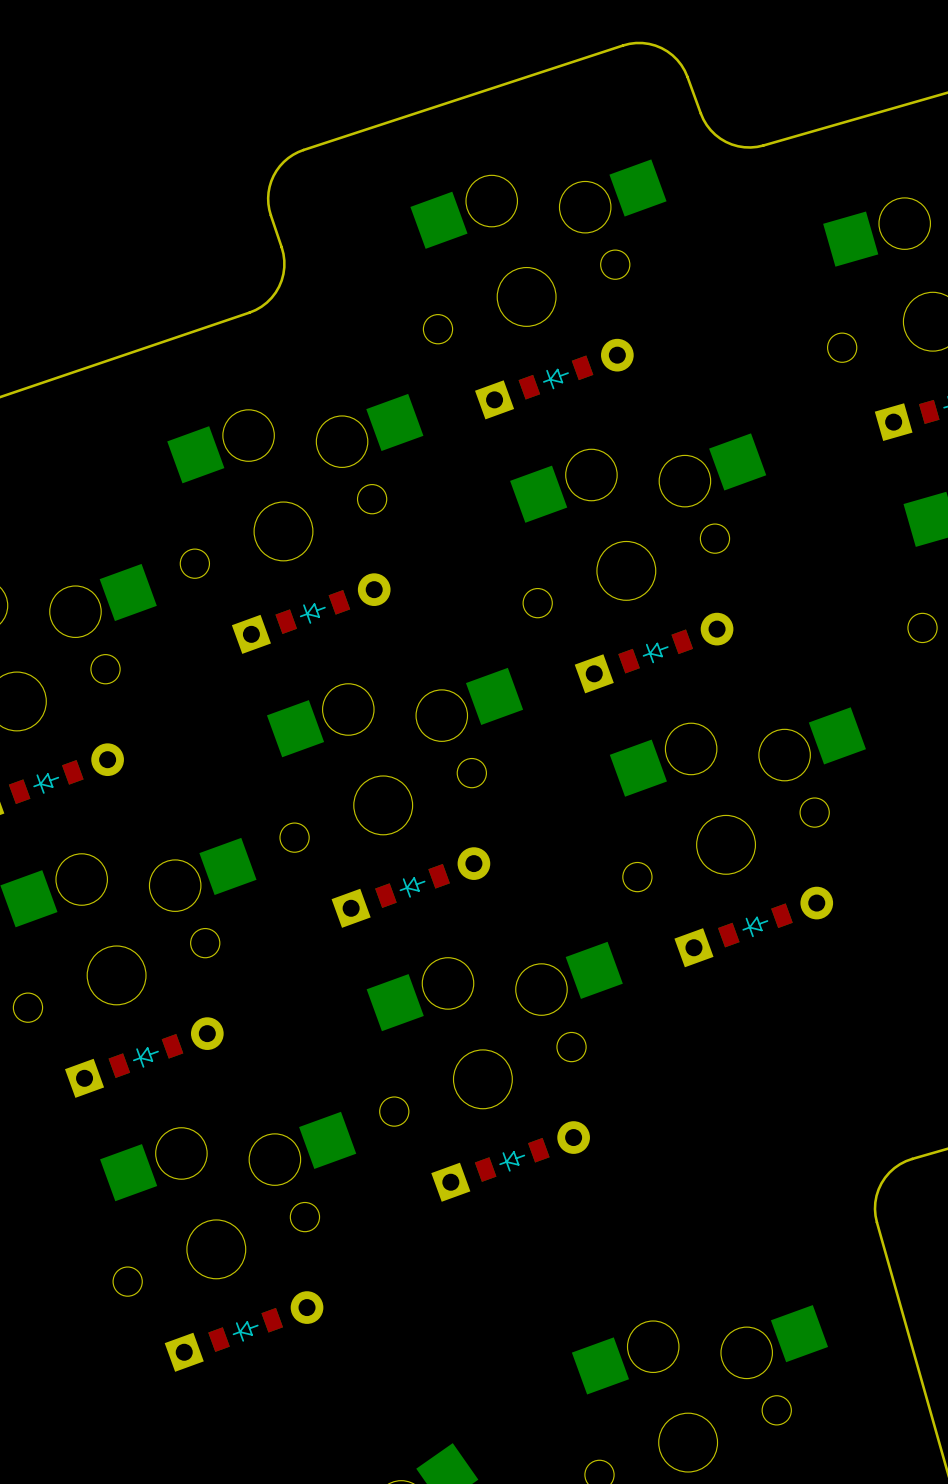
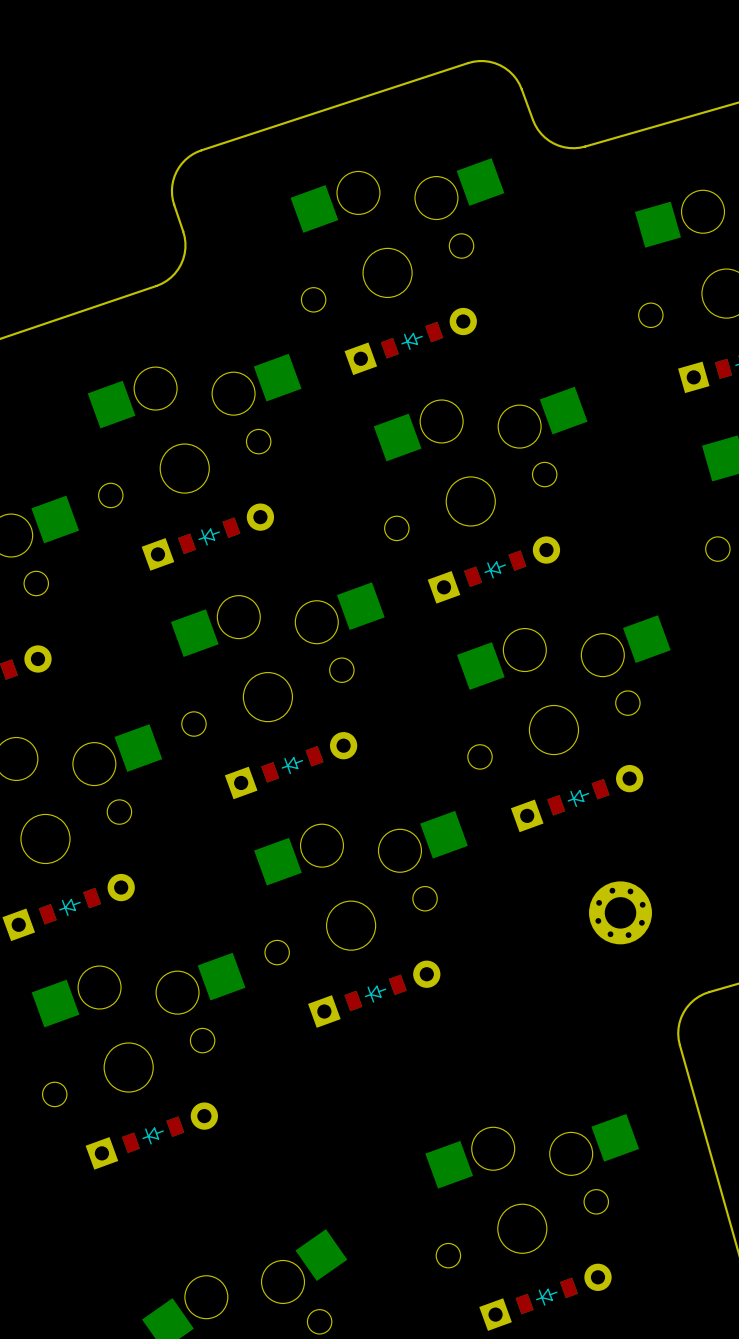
part: none -> (620, 912)

